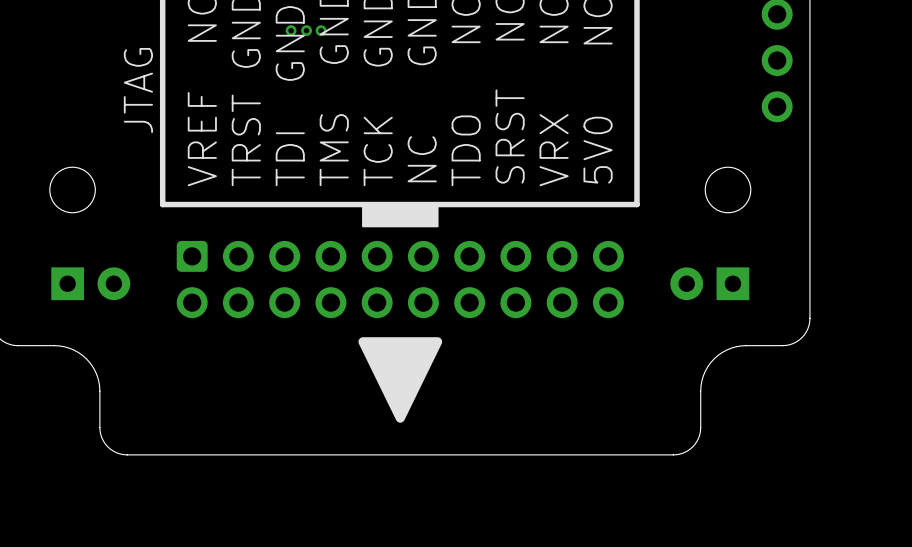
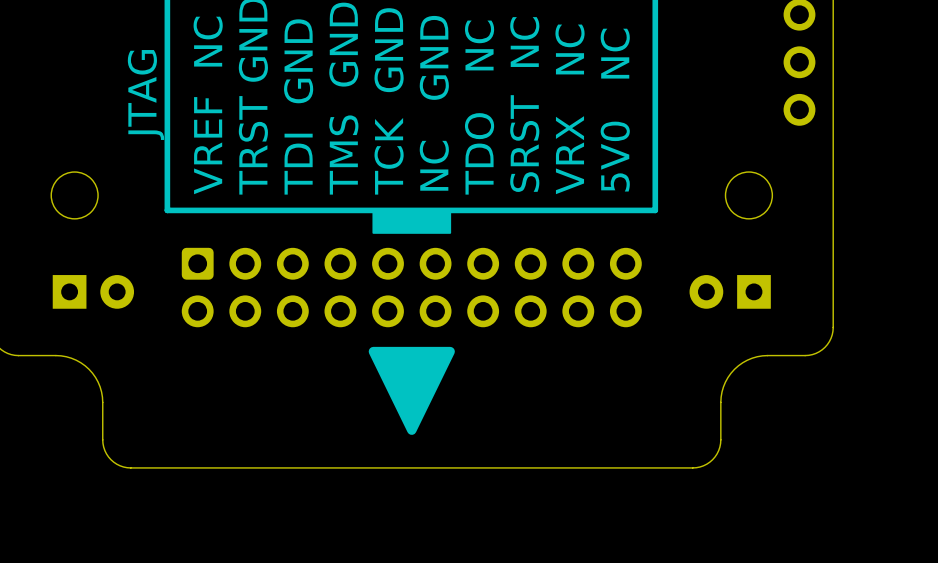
via: (291, 30) -> none
via: (306, 30) -> none
via: (321, 30) -> none

